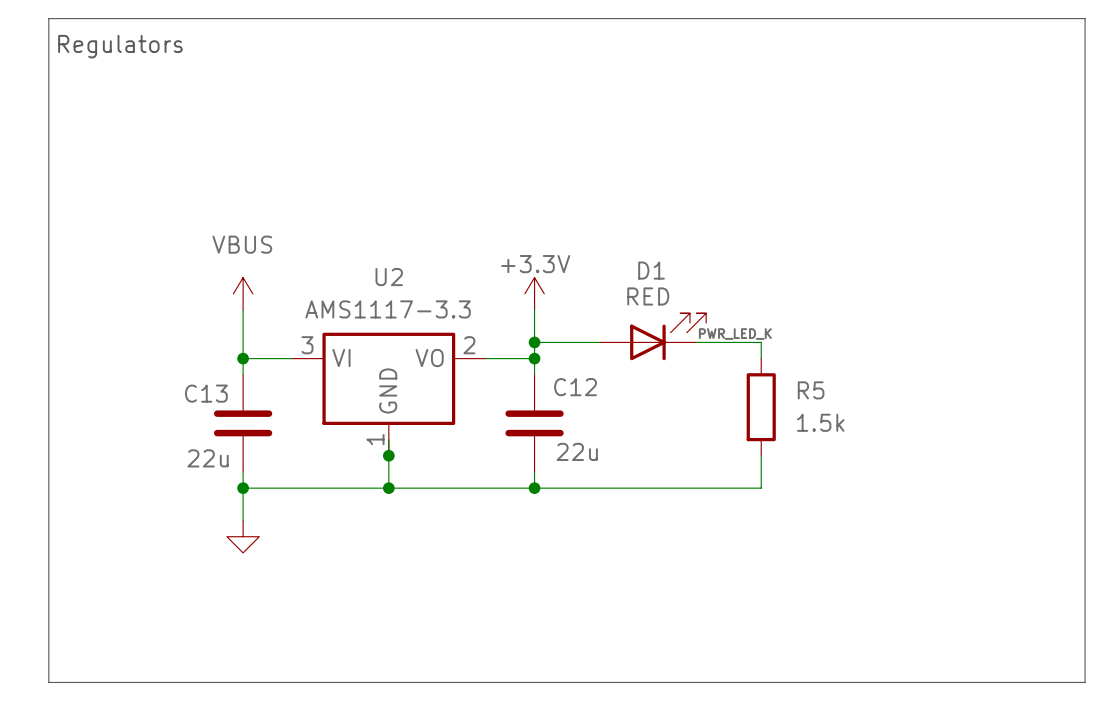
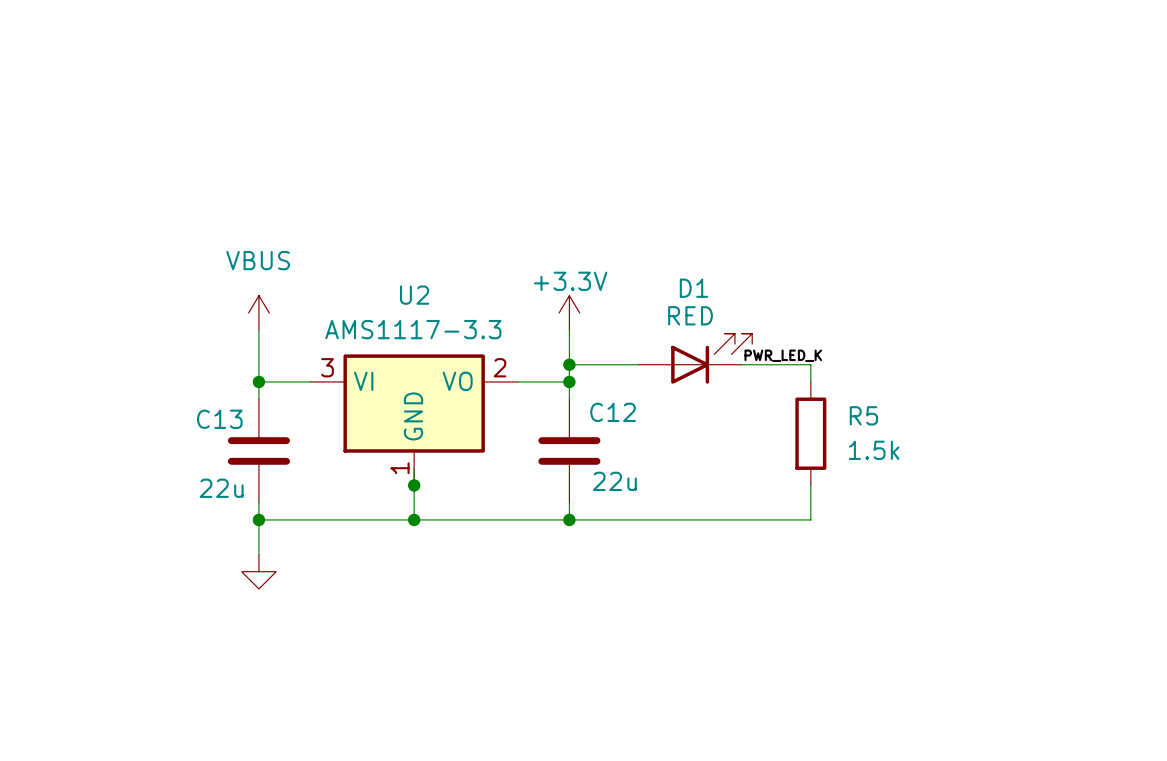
line: (48, 18) (1085, 18) (1085, 682) (48, 682) (48, 18) -> none
text: Regulators (120, 46) -> none

